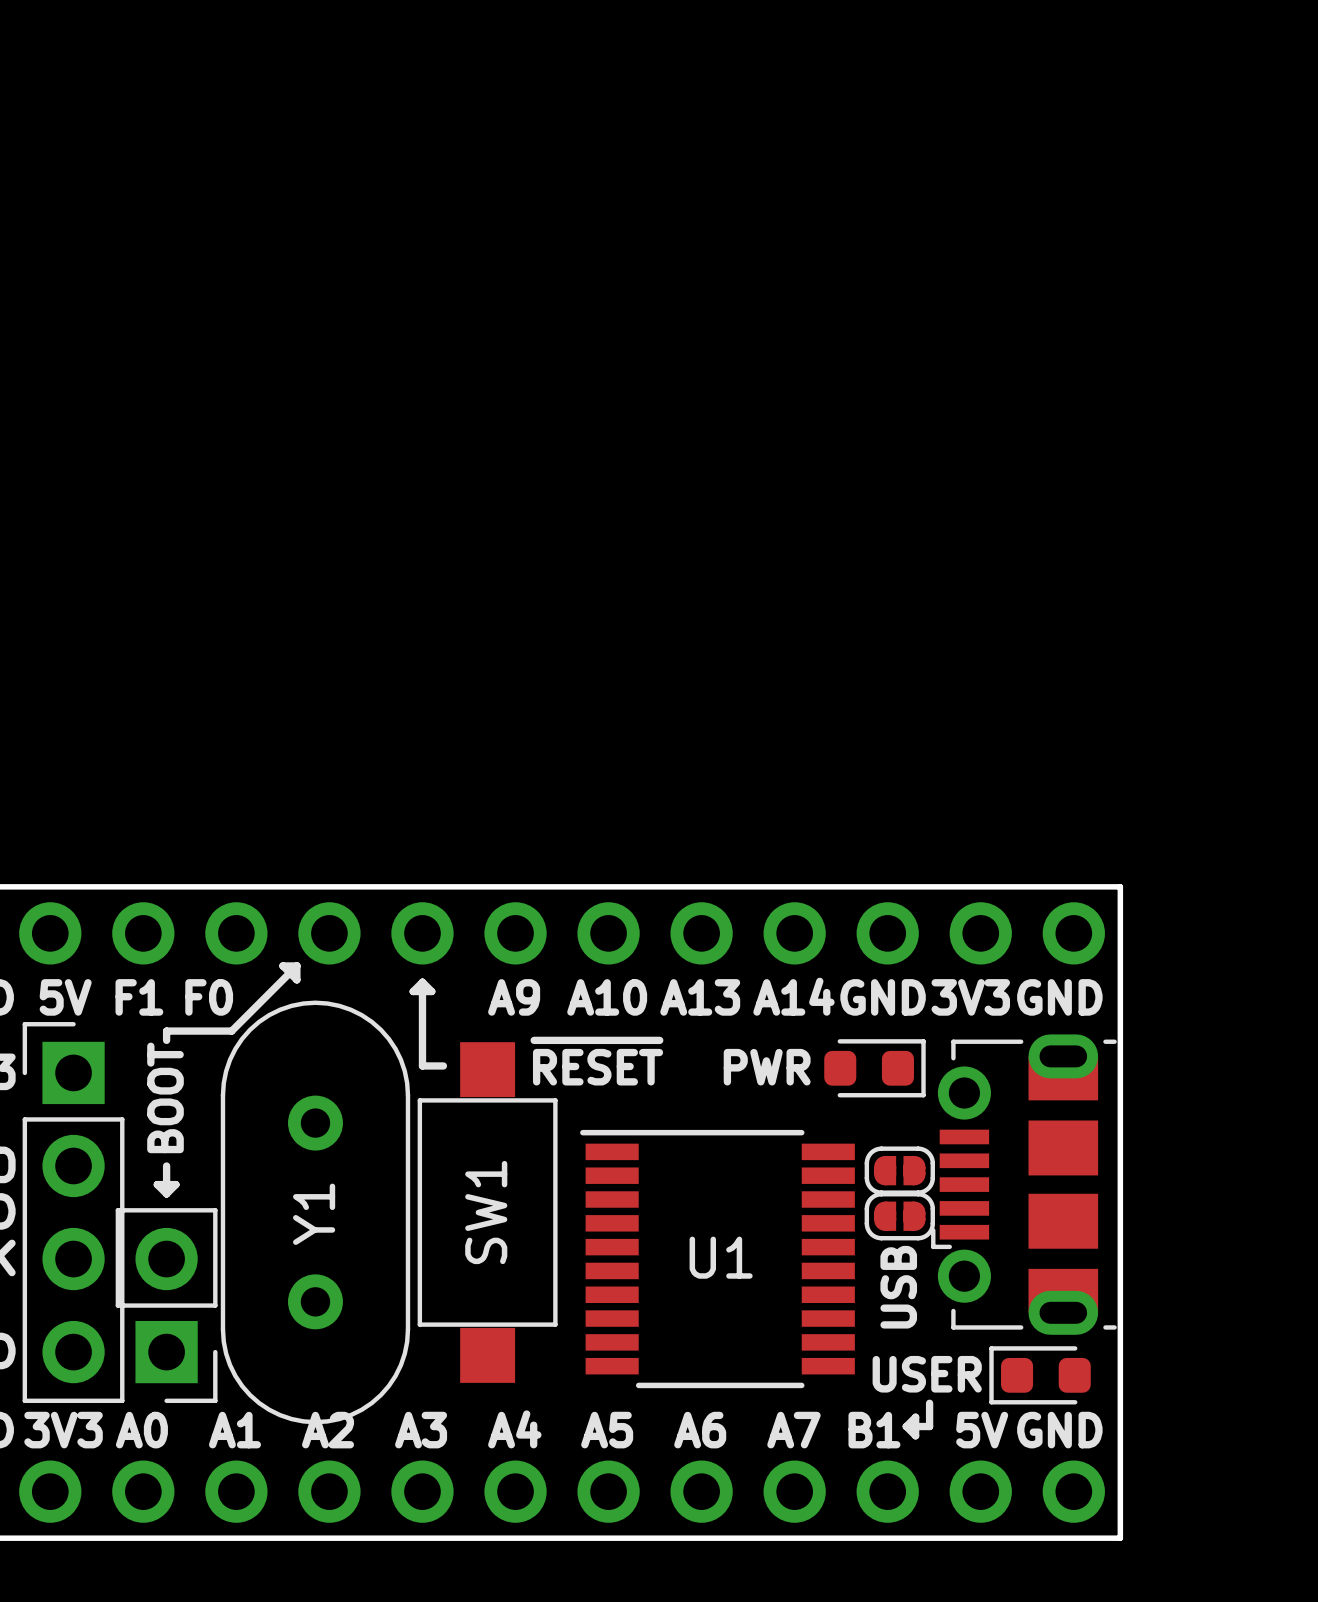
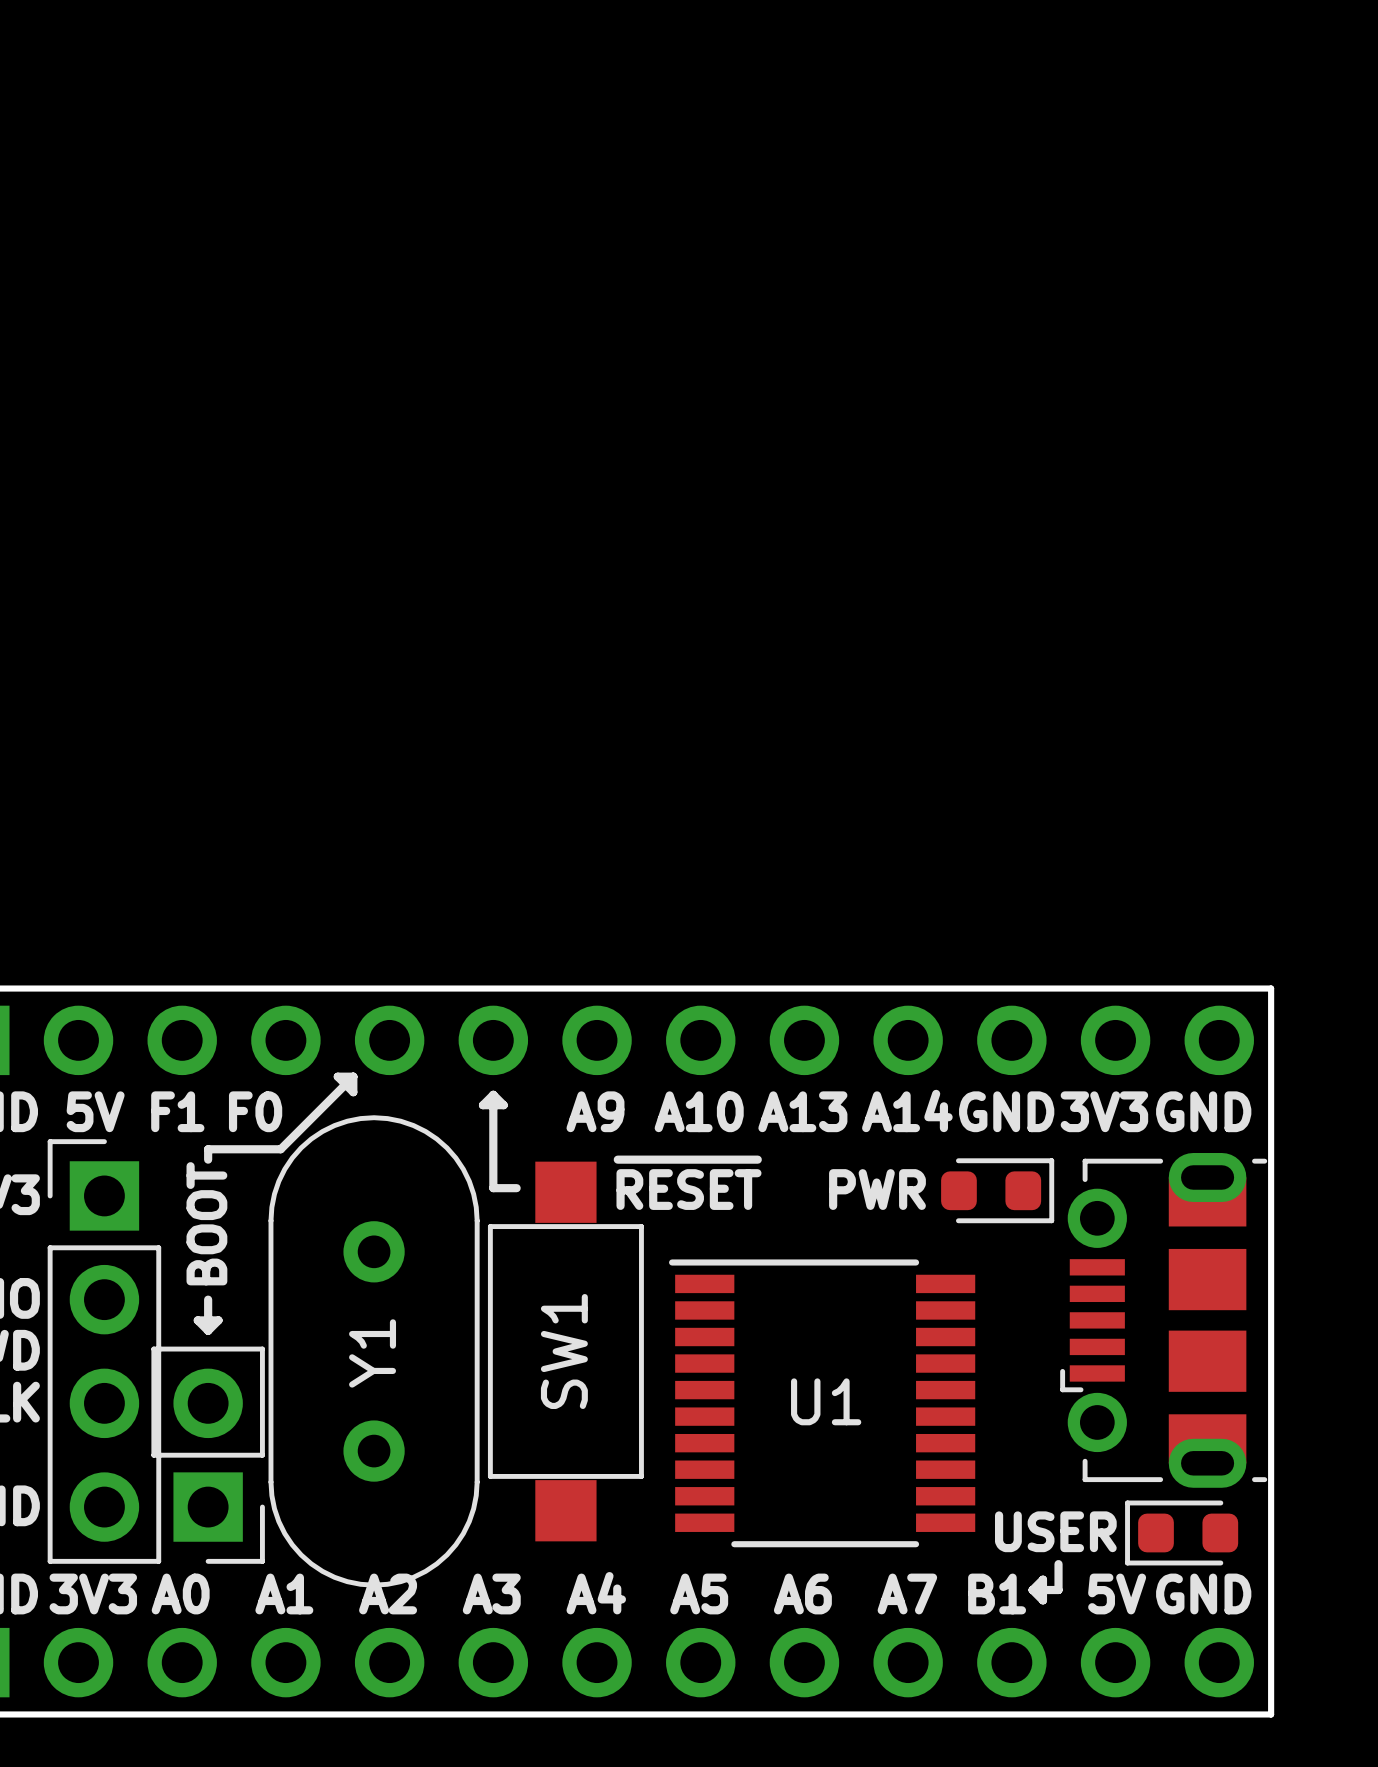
part: (899, 1170) -> none
part: (899, 1216) -> none
text: USB (898, 1287) -> none

